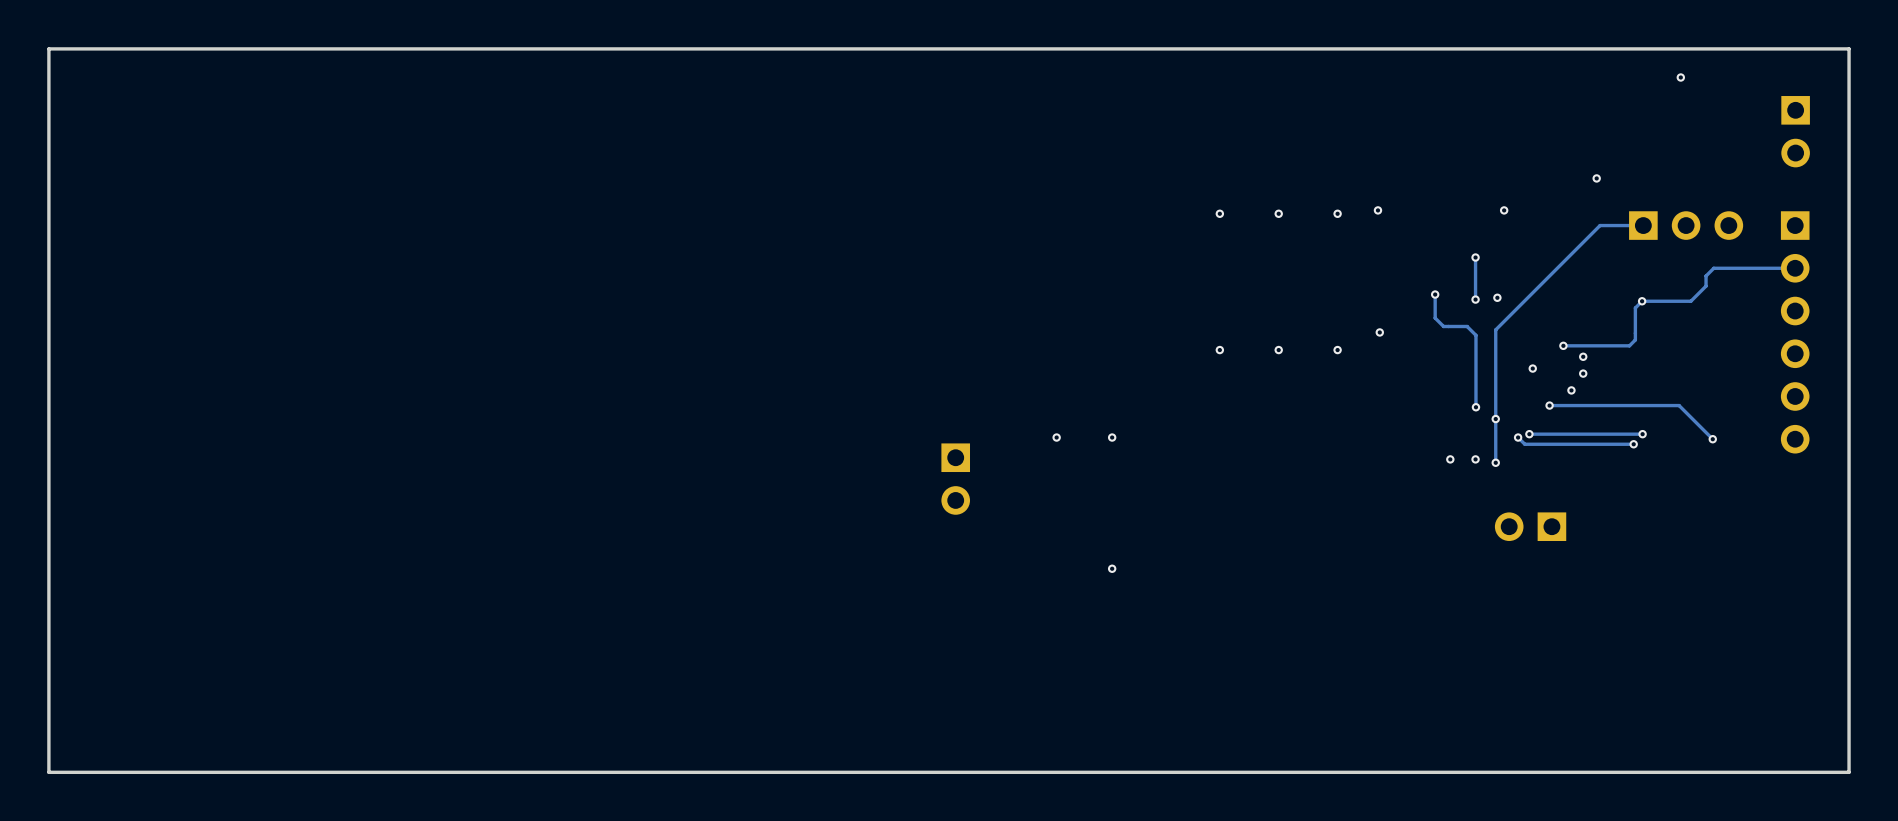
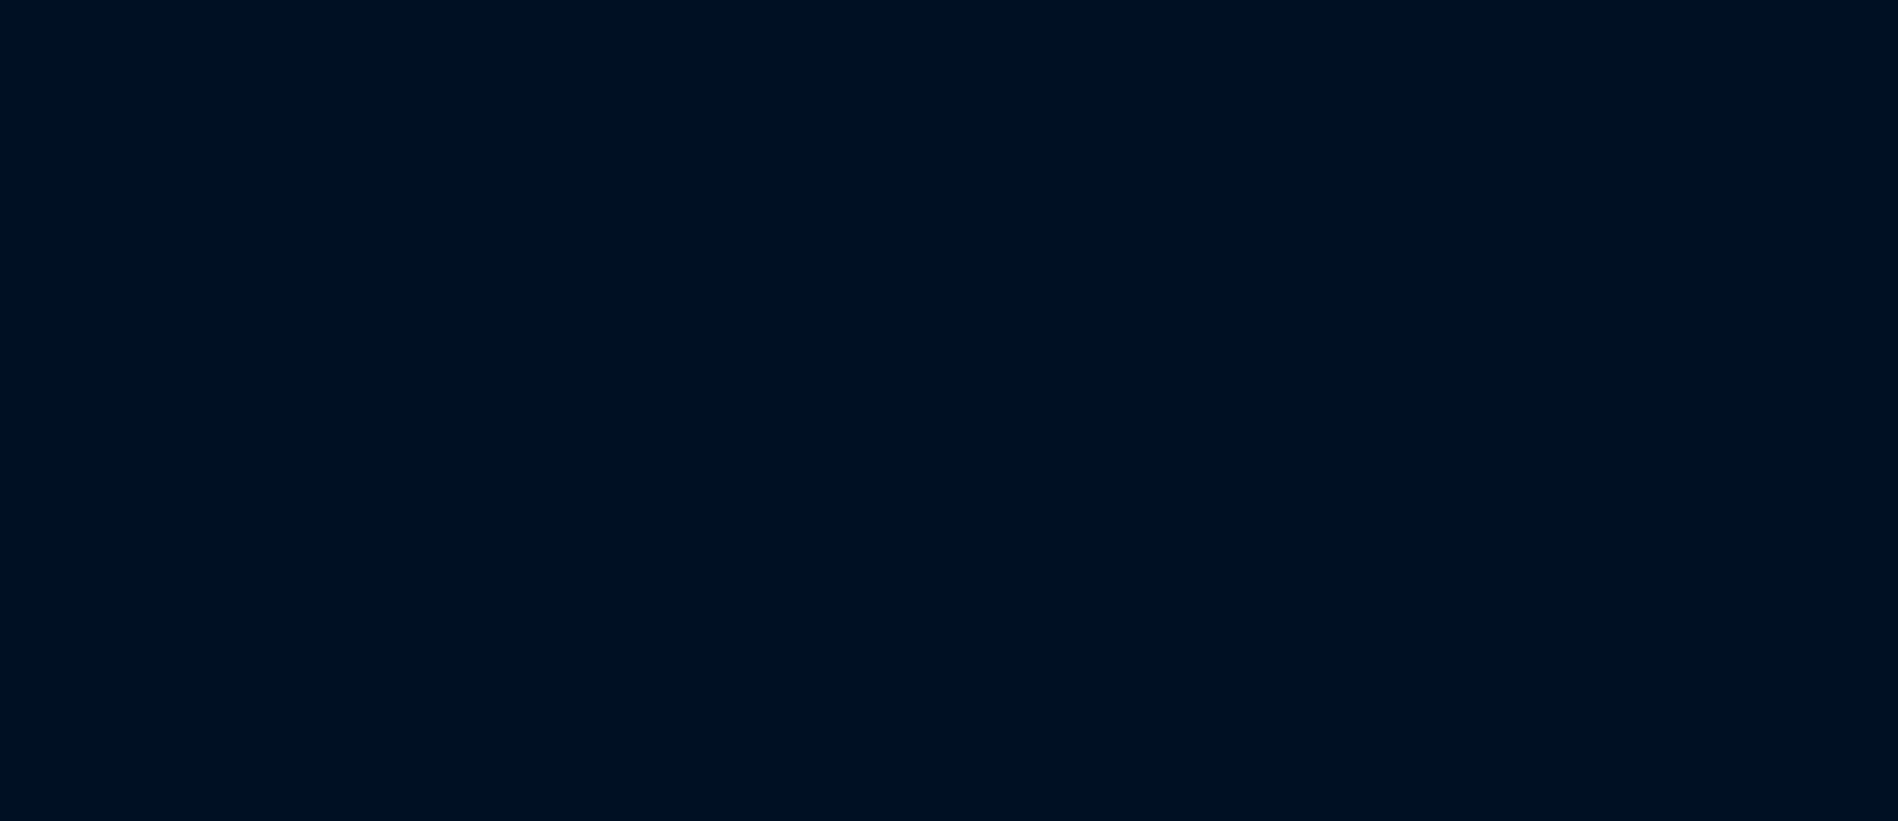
board edge: (1849, 48) (48, 48) (48, 772) (1849, 772) (1849, 48) -> none
via: (1680, 77) -> none
part: (1795, 131) -> none
via: (1596, 178) -> none
via: (1377, 210) -> none
via: (1504, 210) -> none
via: (1219, 213) -> none
via: (1278, 213) -> none
via: (1337, 213) -> none
track: (1643, 225) (1600, 225) (1495, 329) (1495, 462) -> none
part: (1686, 225) -> none
track: (1475, 257) (1475, 299) -> none
via: (1475, 257) -> none
track: (1795, 268) (1713, 268) (1706, 276) (1706, 286) (1690, 301) (1642, 301) (1635, 307) (1635, 339) (1629, 345) (1563, 345) -> none
track: (1435, 294) (1435, 318) (1443, 326) (1467, 326) (1475, 335) (1475, 407) -> none
via: (1435, 294) -> none
via: (1497, 297) -> none
via: (1475, 299) -> none
via: (1642, 301) -> none
via: (1379, 332) -> none
part: (1795, 332) -> none
via: (1563, 345) -> none
via: (1219, 350) -> none
via: (1278, 350) -> none
via: (1337, 350) -> none
via: (1583, 356) -> none
via: (1532, 368) -> none
via: (1583, 373) -> none
via: (1571, 390) -> none
track: (1549, 405) (1679, 405) (1712, 439) -> none
via: (1549, 405) -> none
via: (1475, 407) -> none
via: (1495, 419) -> none
via: (1529, 434) -> none
track: (1642, 434) (1529, 434) -> none
via: (1642, 434) -> none
via: (1056, 437) -> none
via: (1112, 437) -> none
track: (1518, 437) (1524, 444) (1633, 444) -> none
via: (1518, 437) -> none
via: (1712, 439) -> none
via: (1633, 444) -> none
via: (1450, 459) -> none
via: (1475, 459) -> none
via: (1495, 462) -> none
part: (955, 479) -> none
part: (1530, 526) -> none
via: (1112, 568) -> none

